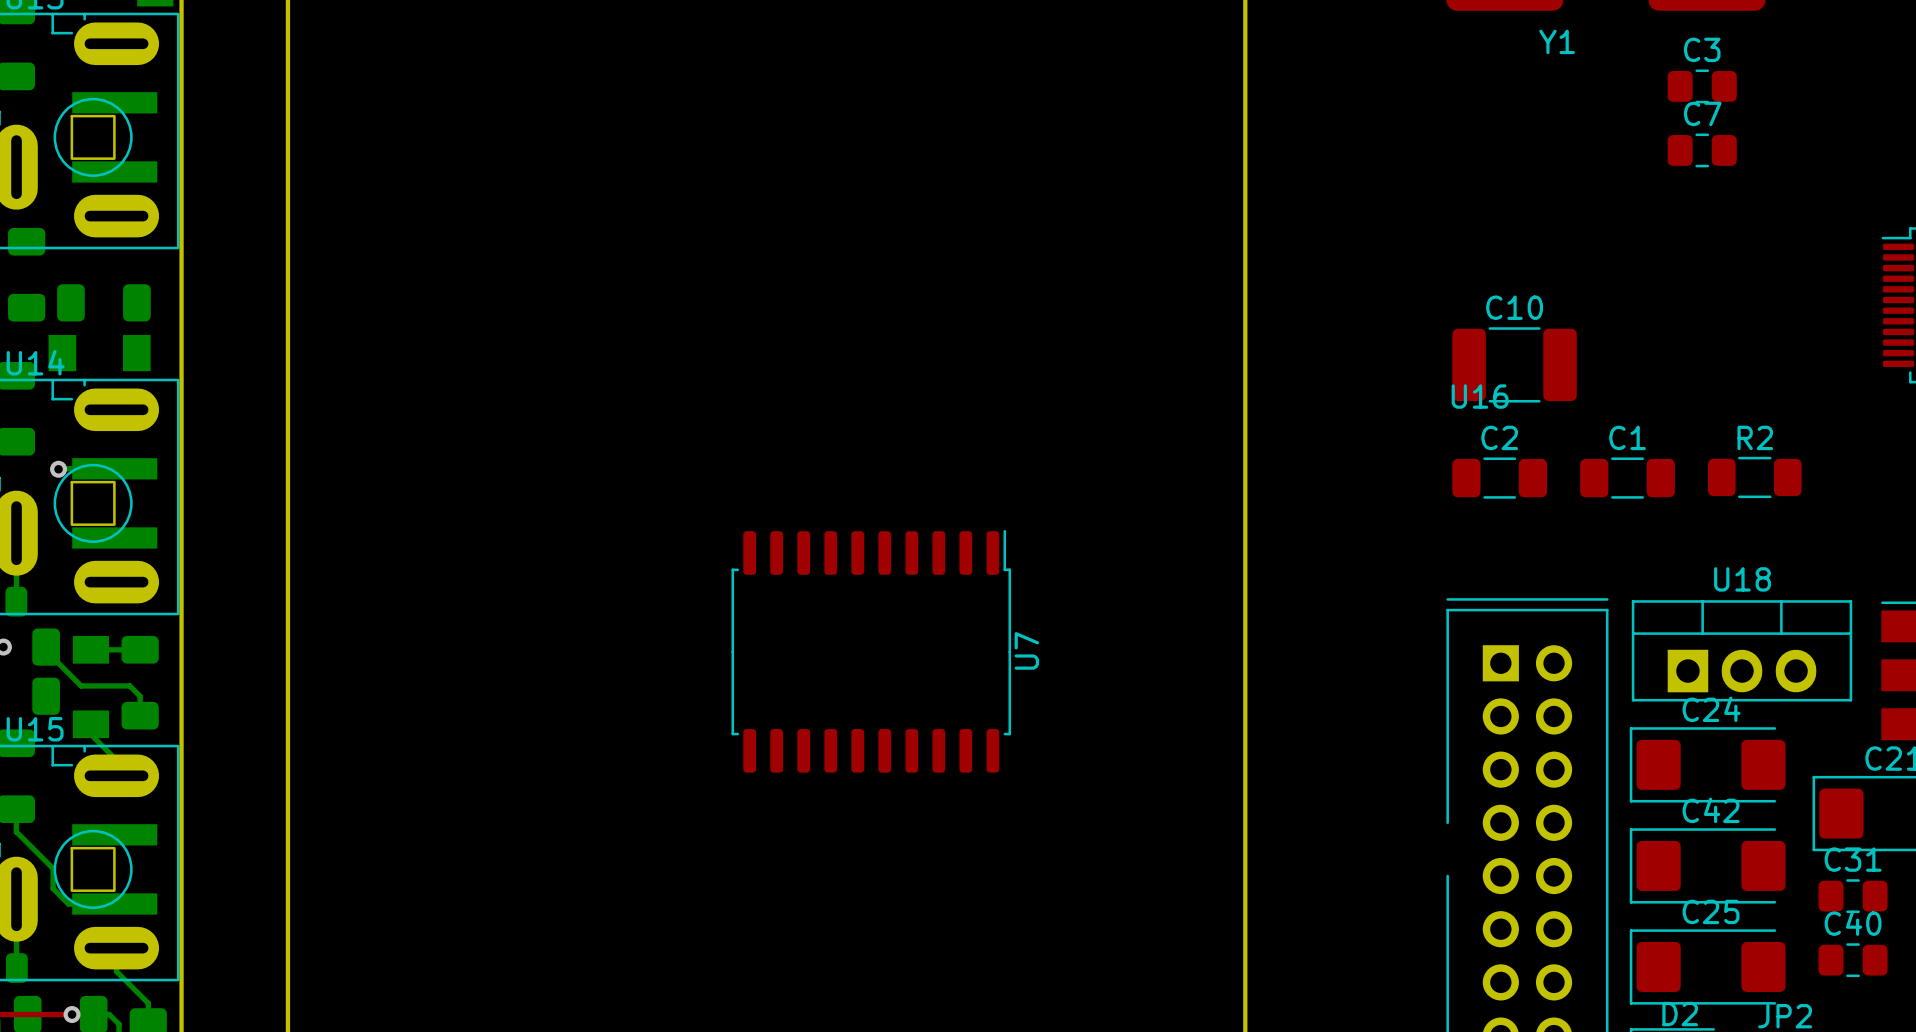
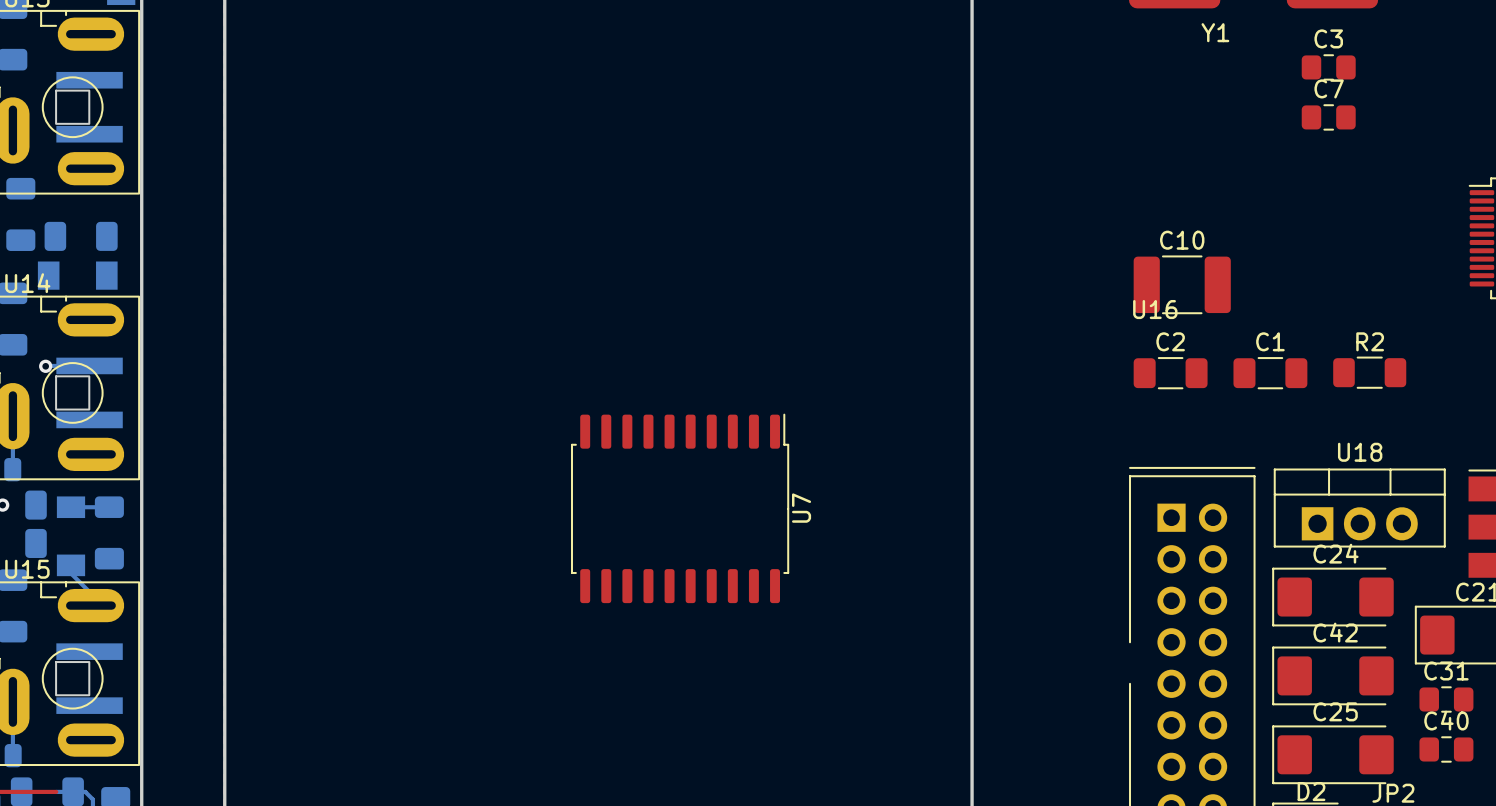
bottom track: (46, 647) (46, 650) (81, 685) (129, 685) (140, 696) (140, 715) -> none
bottom track: (16, 809) (16, 831) (53, 868) (53, 888) (68, 904) (114, 904) -> none
bottom track: (116, 948) (116, 971) (148, 1003) (148, 1022) -> none
via: (72, 1014) -> none

